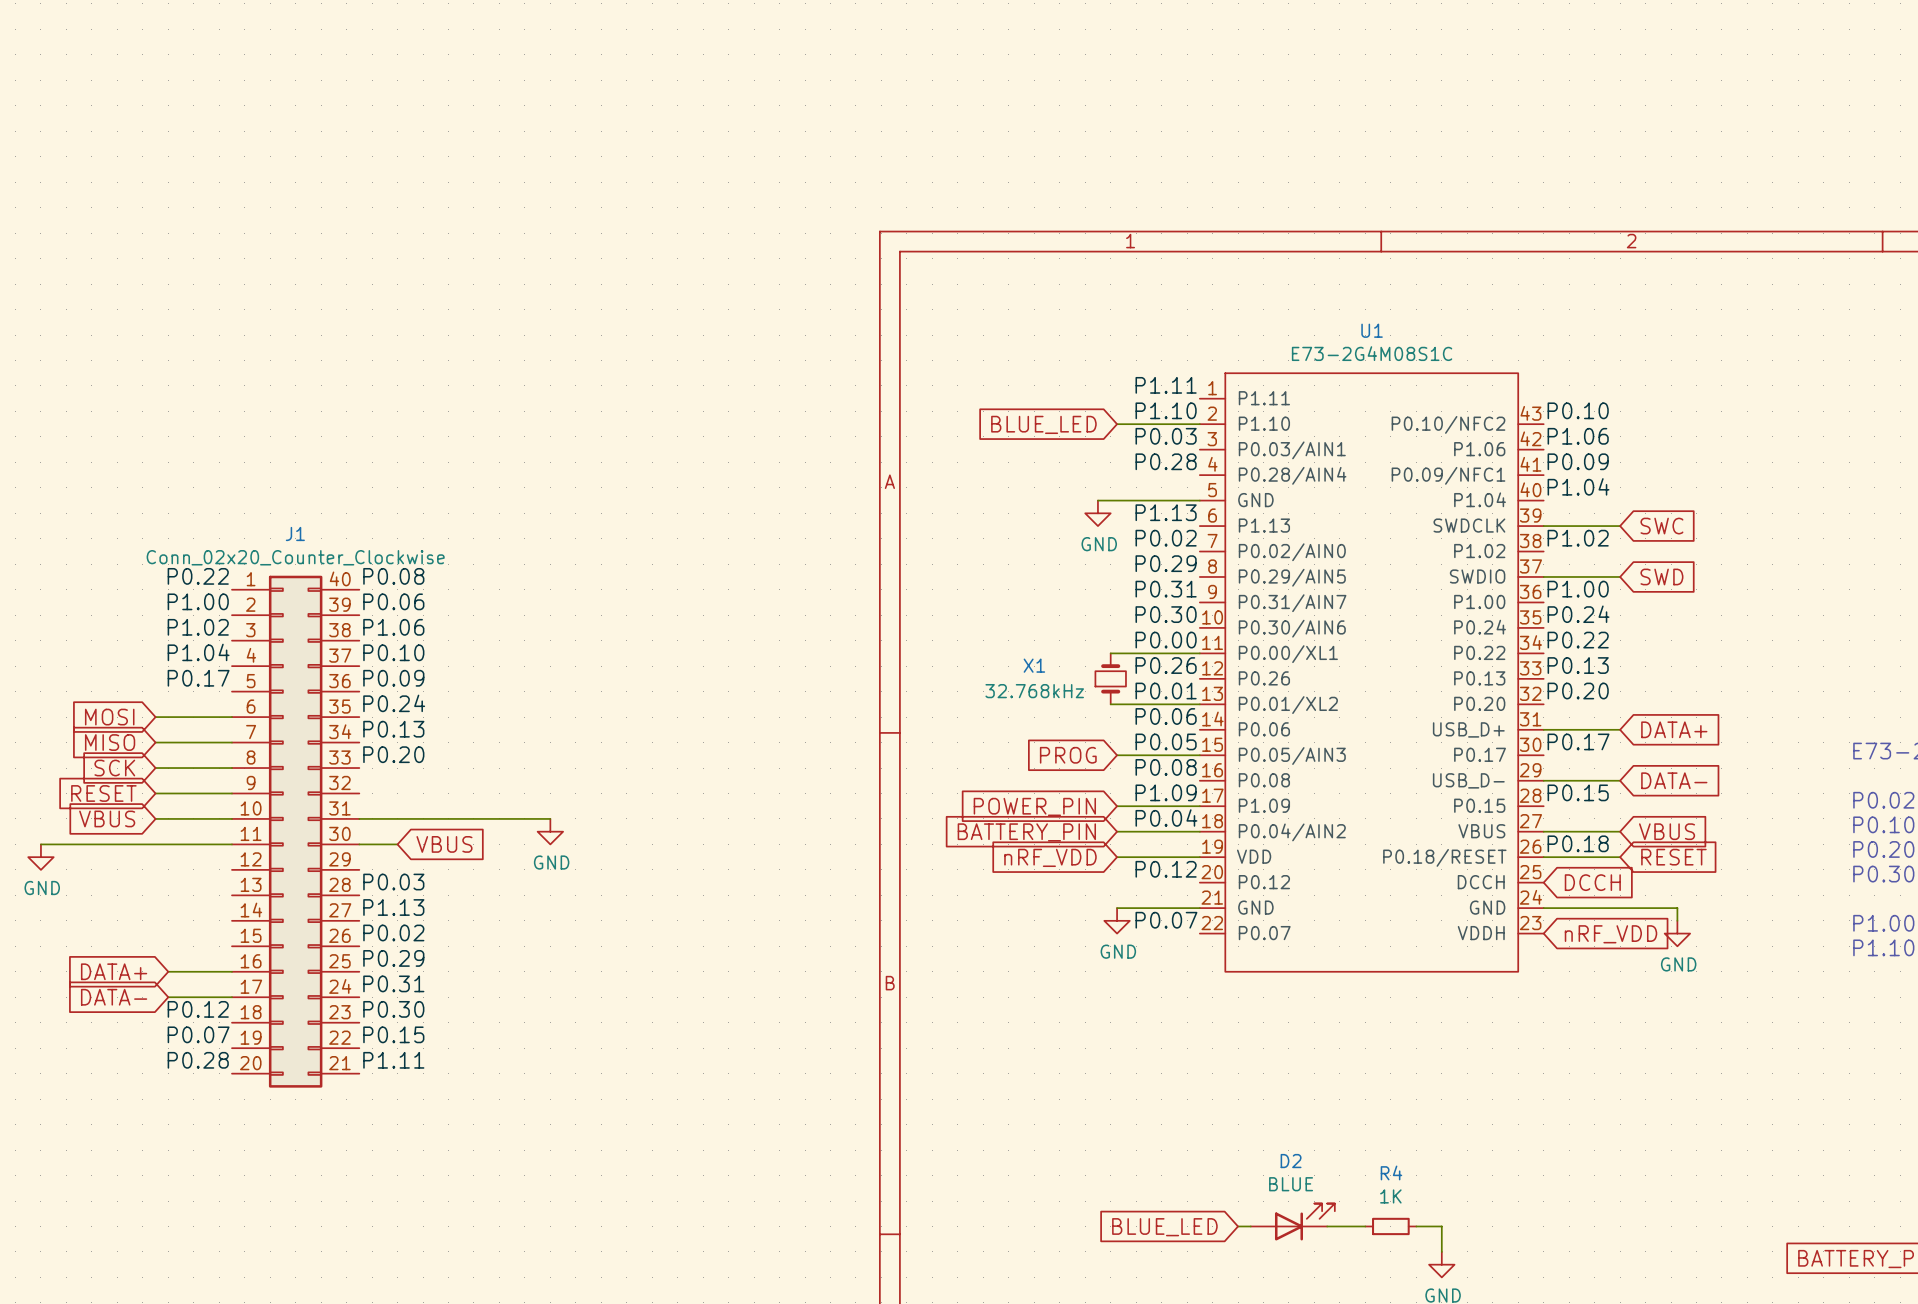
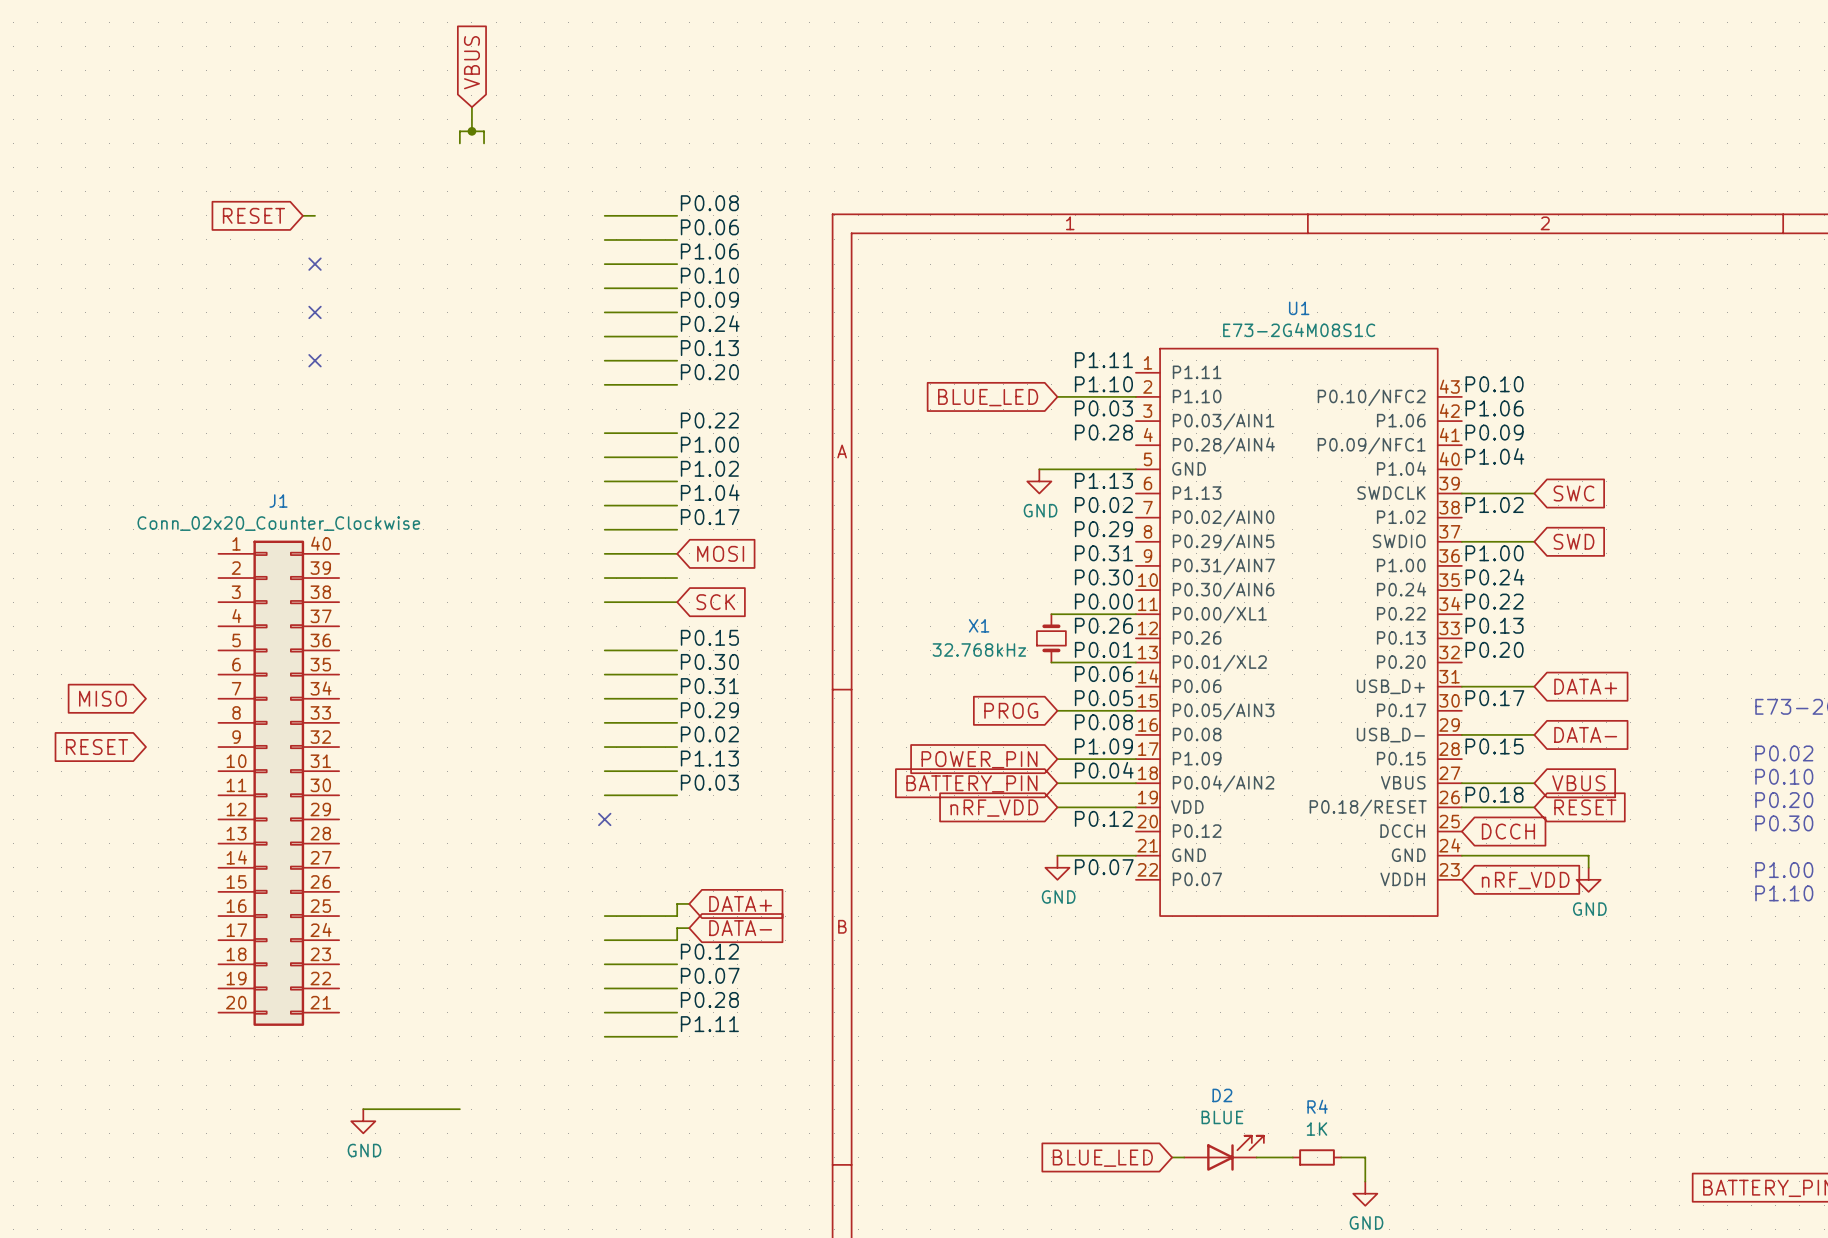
global label: none -> VBUS (471, 62)
wire: none -> (471, 107) (471, 131)
junction: none -> (471, 131)
wire: none -> (459, 143) (459, 131) (484, 131) (484, 143)
label: none -> P0.08 (709, 203)
global label: none -> RESET (253, 215)
wire: none -> (302, 215) (315, 215)
wire: none -> (604, 215) (677, 215)
label: none -> P0.06 (709, 227)
wire: none -> (604, 239) (677, 239)
label: none -> P1.06 (709, 251)
no-connect mark: none -> (315, 264)
wire: none -> (604, 264) (677, 264)
label: none -> P0.10 (709, 275)
wire: none -> (604, 288) (677, 288)
label: none -> P0.09 (709, 299)
no-connect mark: none -> (315, 312)
wire: none -> (604, 312) (677, 312)
label: none -> P0.24 (710, 323)
wire: none -> (604, 336) (677, 336)
label: none -> P0.13 (709, 348)
no-connect mark: none -> (315, 360)
wire: none -> (604, 360) (677, 360)
label: none -> P0.20 (709, 372)
wire: none -> (604, 384) (677, 384)
label: none -> P0.22 (709, 420)
wire: none -> (604, 433) (677, 433)
label: none -> P1.00 (709, 444)
wire: none -> (604, 457) (677, 457)
label: none -> P1.02 (709, 468)
wire: none -> (604, 481) (677, 481)
label: none -> P1.04 (710, 492)
wire: none -> (604, 505) (677, 505)
label: none -> P0.17 (710, 517)
wire: none -> (604, 529) (677, 529)
label: P0.22 (198, 576) -> none
label: P0.08 (393, 576) -> none
wire: none -> (604, 553) (677, 553)
global label: none -> MOSI (720, 553)
label: P1.00 (198, 601) -> none
label: P0.06 (393, 601) -> none
wire: none -> (604, 578) (677, 578)
label: P1.02 (198, 627) -> none
label: P1.06 (393, 627) -> none
wire: none -> (604, 602) (677, 602)
global label: none -> SCK (715, 602)
label: P1.04 (198, 652) -> none
label: P0.10 (393, 652) -> none
label: P0.17 (198, 678) -> none
label: P0.09 (393, 678) -> none
label: none -> P0.15 (709, 637)
wire: none -> (604, 650) (677, 650)
label: P0.24 (394, 703) -> none
label: none -> P0.30 (709, 661)
global label: MOSI (109, 717) -> none
wire: (155, 717) (231, 717) -> none
wire: none -> (604, 674) (677, 674)
label: P0.13 (393, 729) -> none
label: none -> P0.31 (709, 686)
wire: (155, 742) (231, 742) -> none
wire: none -> (604, 698) (677, 698)
label: P0.20 (393, 754) -> none
label: none -> P0.29 (709, 710)
global label: SCK (114, 768) -> none
wire: (155, 768) (231, 768) -> none
wire: none -> (604, 722) (677, 722)
label: none -> P0.02 (709, 734)
wire: (155, 793) (231, 793) -> none
wire: none -> (604, 747) (677, 747)
label: none -> P1.13 (709, 758)
global label: VBUS (107, 818) -> none
wire: (155, 818) (231, 818) -> none
wire: (359, 818) (550, 818) -> none
wire: none -> (604, 771) (677, 771)
power symbol: GND (550, 831) -> none
label: none -> P0.03 (709, 782)
wire: (40, 844) (231, 844) -> none
wire: (359, 844) (397, 844) -> none
global label: VBUS (444, 844) -> none
wire: none -> (604, 795) (677, 795)
power symbol: GND (40, 857) -> none
no-connect mark: none -> (604, 819)
label: P0.03 (393, 882) -> none
label: P1.13 (393, 907) -> none
label: P0.02 (393, 932) -> none
label: P0.29 (393, 958) -> none
wire: none -> (689, 903) (677, 903) (677, 916) (604, 916)
global label: none -> DATA+ (740, 903)
global label: DATA+ (114, 971) -> none
wire: (168, 971) (231, 971) -> none
label: P0.31 (393, 983) -> none
wire: none -> (689, 928) (677, 928) (677, 940) (604, 940)
global label: none -> DATA- (740, 928)
global label: DATA- (114, 997) -> none
wire: (168, 997) (231, 997) -> none
label: P0.12 (198, 1009) -> none
label: P0.30 (393, 1009) -> none
label: none -> P0.12 (709, 951)
wire: none -> (604, 964) (677, 964)
label: P0.07 (198, 1034) -> none
label: P0.15 (393, 1034) -> none
label: none -> P0.07 (710, 975)
wire: none -> (604, 988) (677, 988)
label: P0.28 (198, 1060) -> none
label: P1.11 (393, 1060) -> none
label: none -> P0.28 (709, 999)
wire: none -> (604, 1012) (677, 1012)
label: none -> P1.11 (709, 1024)
wire: none -> (604, 1036) (677, 1036)
wire: none -> (363, 1109) (459, 1109)
power symbol: none -> GND (363, 1121)

